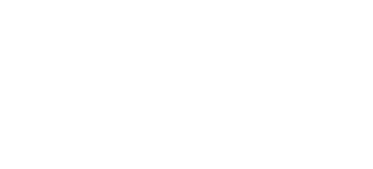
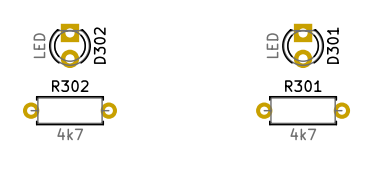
D302: none -> LED (69, 45)
D301: none -> LED (303, 45)
R302: none -> 4k7 (69, 110)
R301: none -> 4k7 (303, 110)

